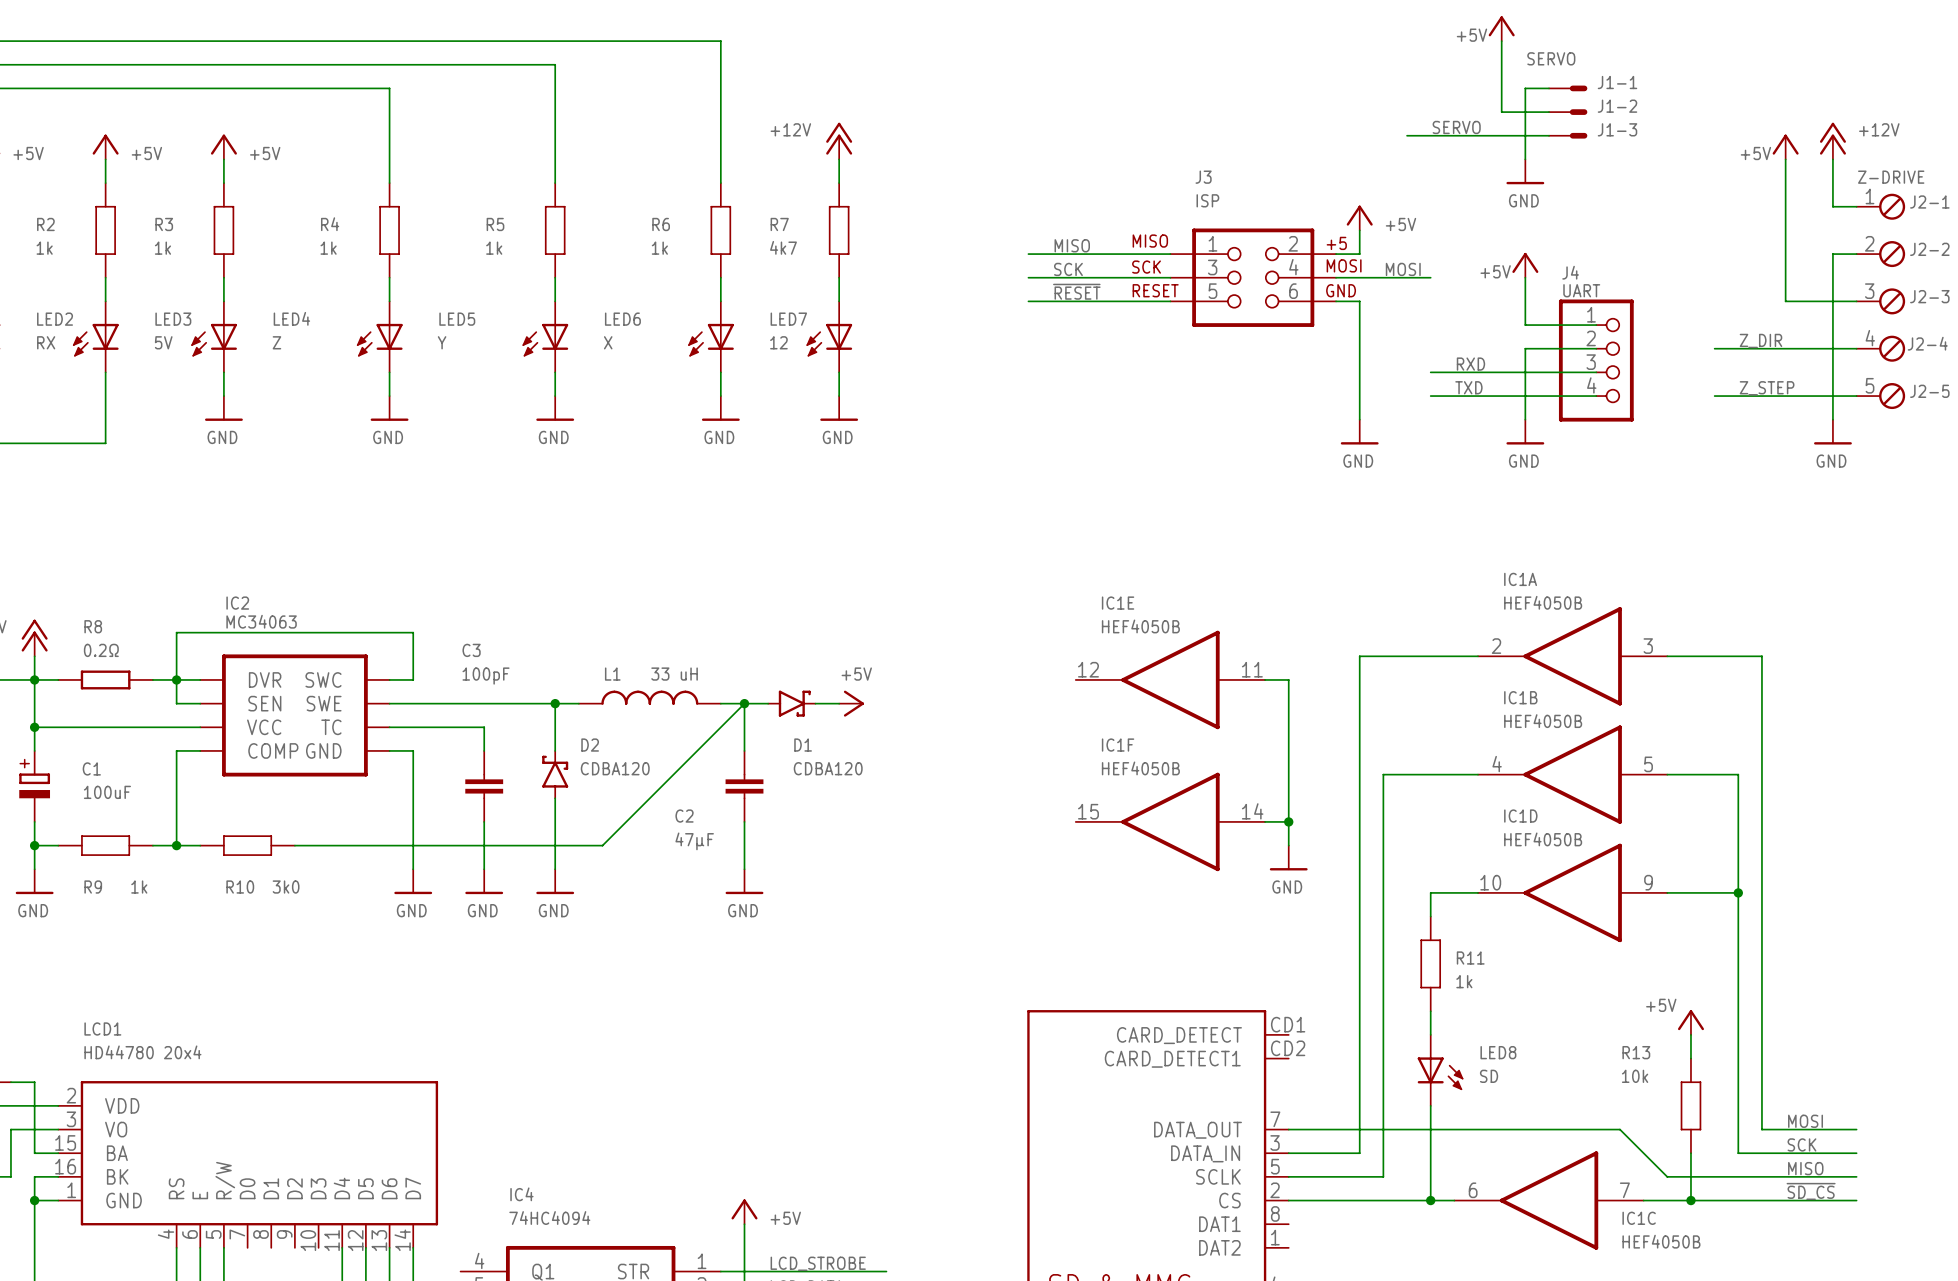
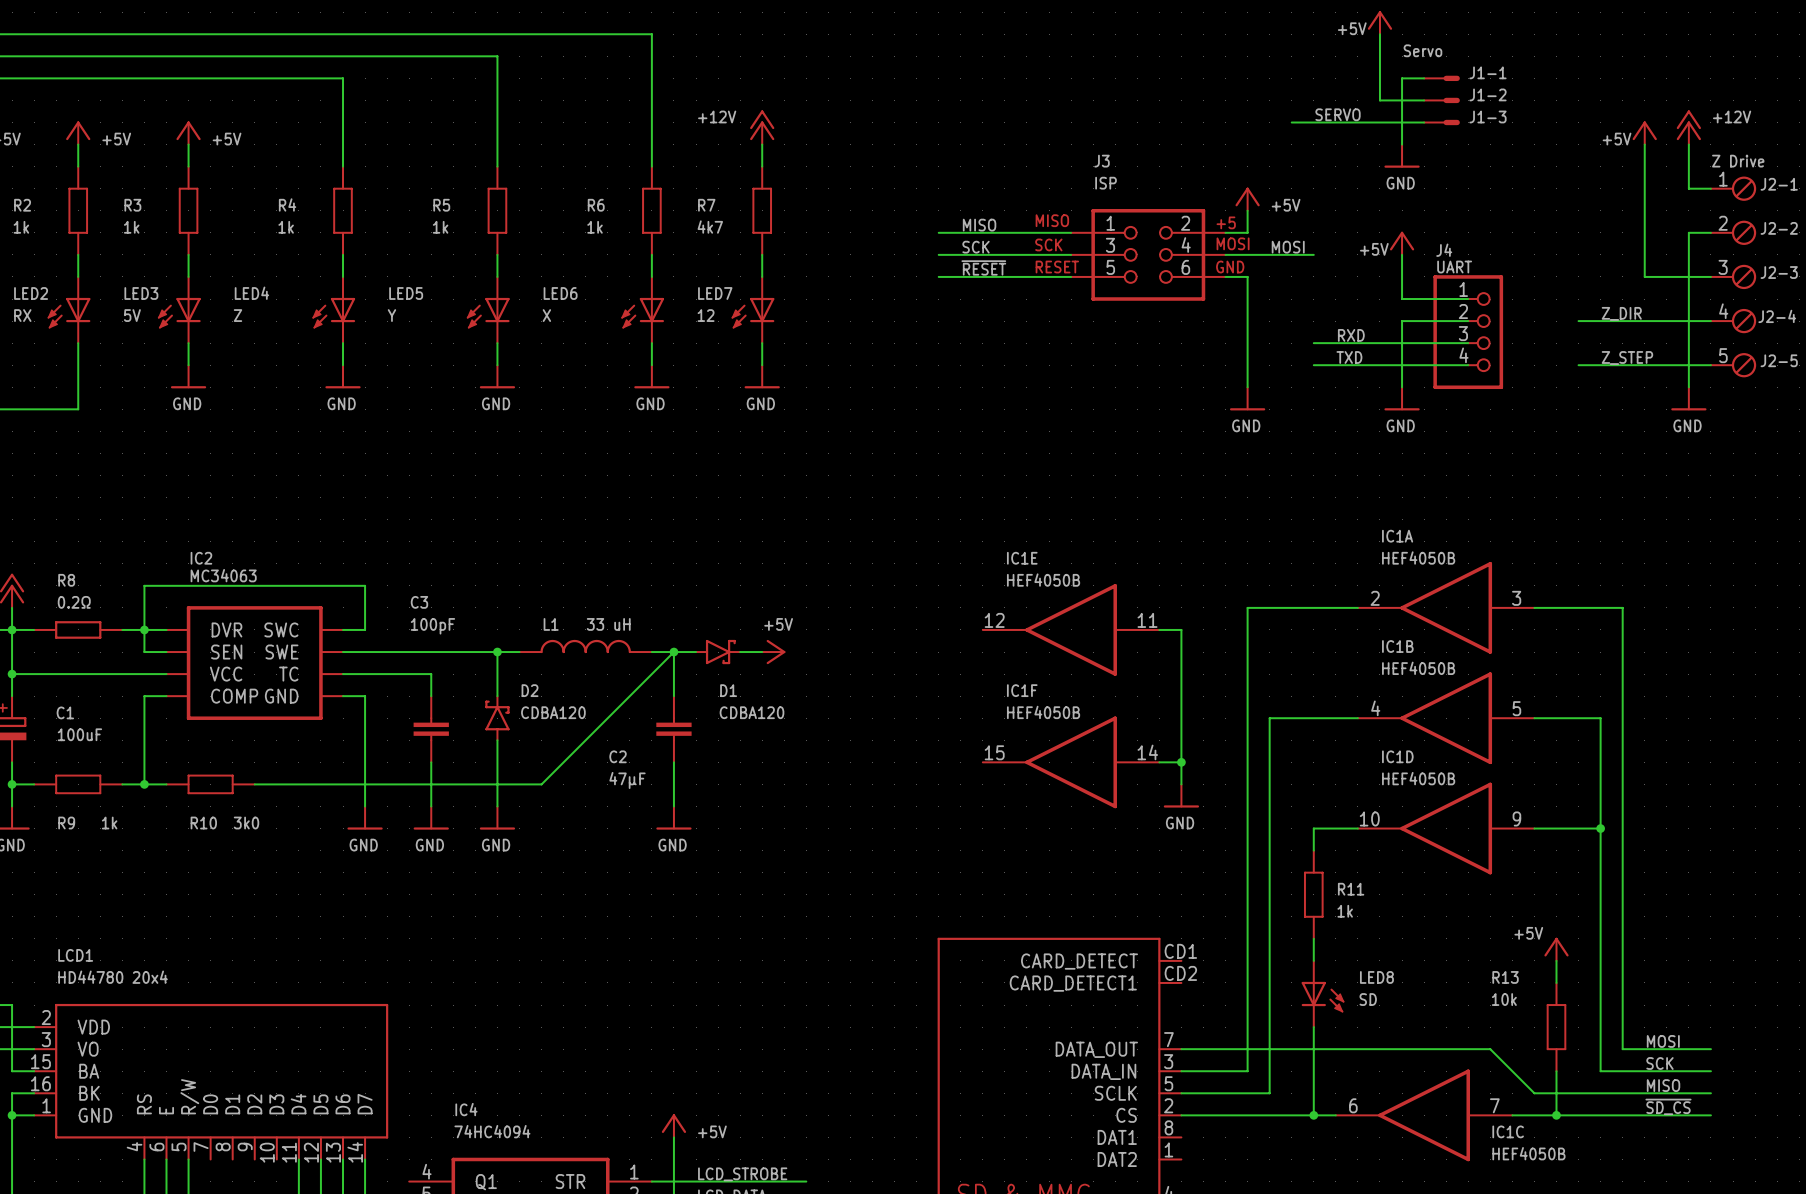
J1-1 value: SERVO (1551, 58) -> Servo (1422, 50)
J2-5 value: Z-DRIVE (1891, 177) -> Z Drive (1738, 161)

